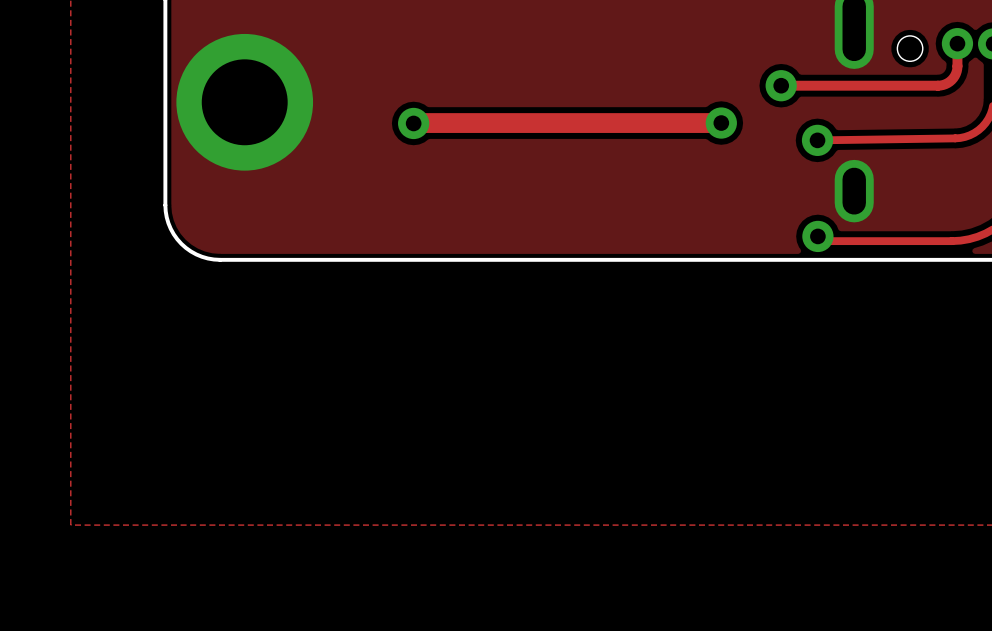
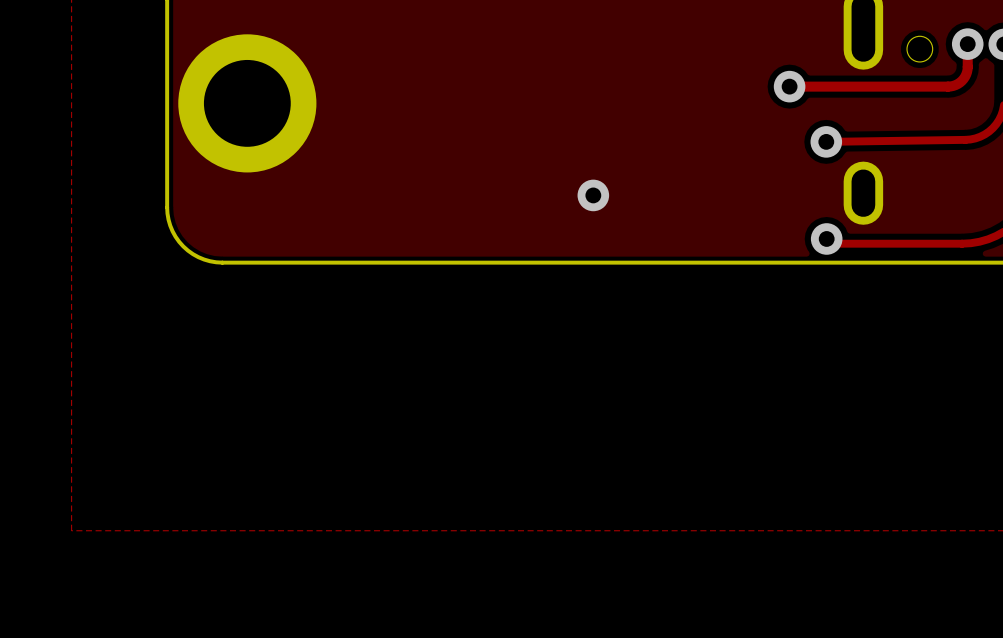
via: (413, 123) -> none
track: (414, 123) (721, 123) -> none
via: (721, 123) -> none
via: none -> (593, 195)

